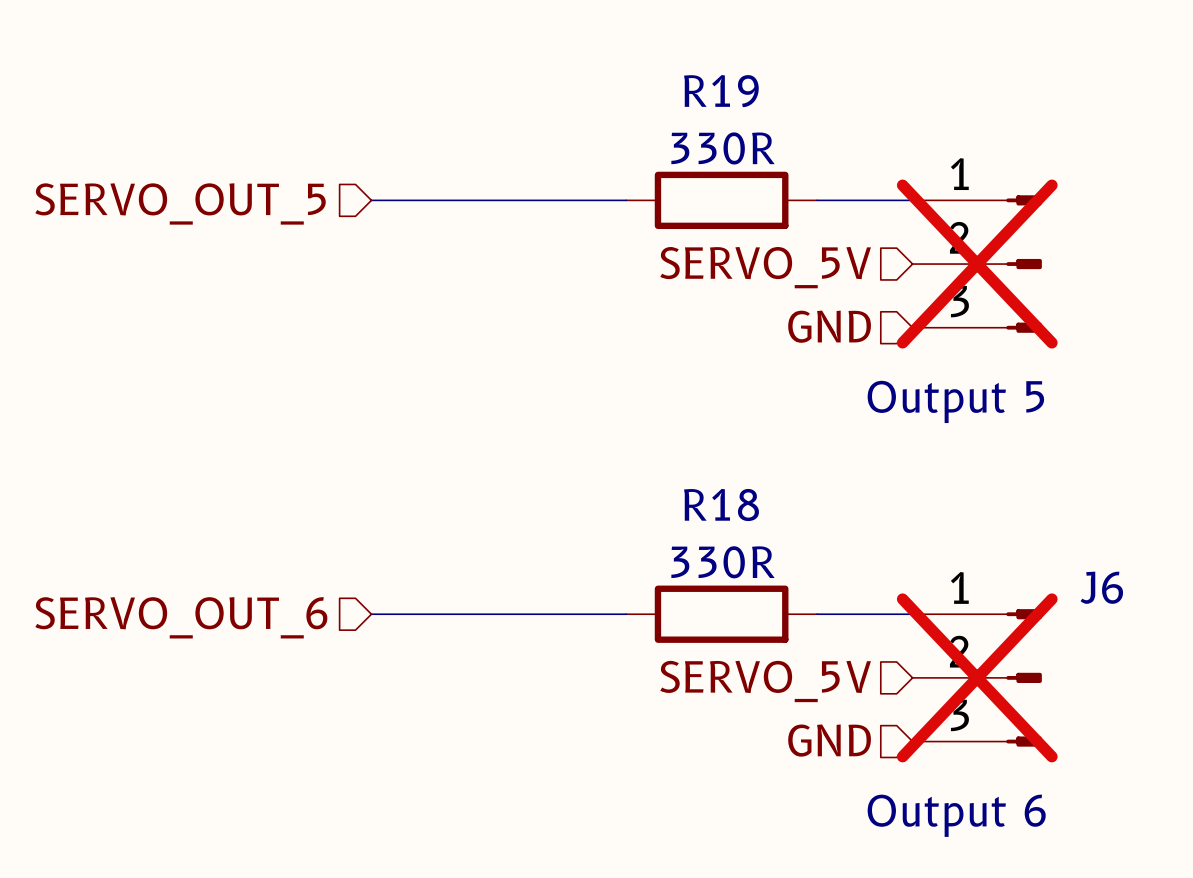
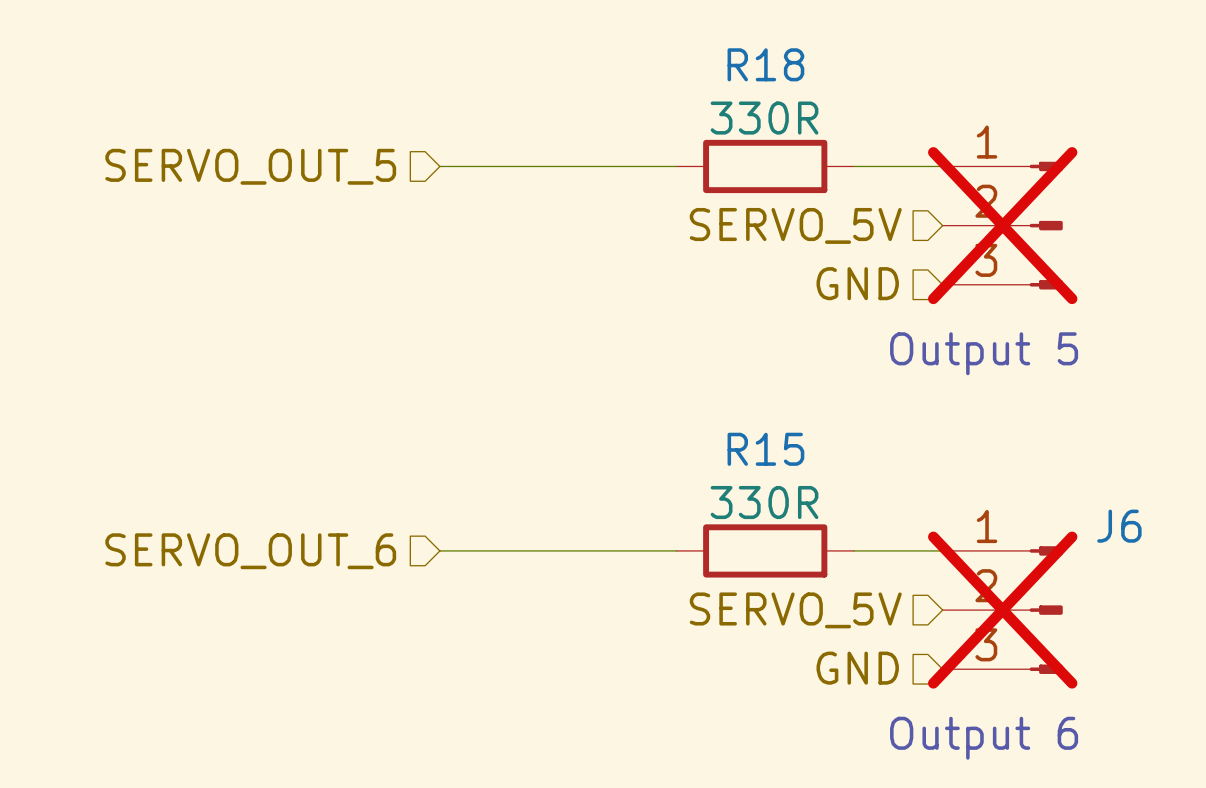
R19 name: R19 (721, 91) -> R18 (765, 64)
R18 name: R18 (721, 504) -> R15 (765, 449)

